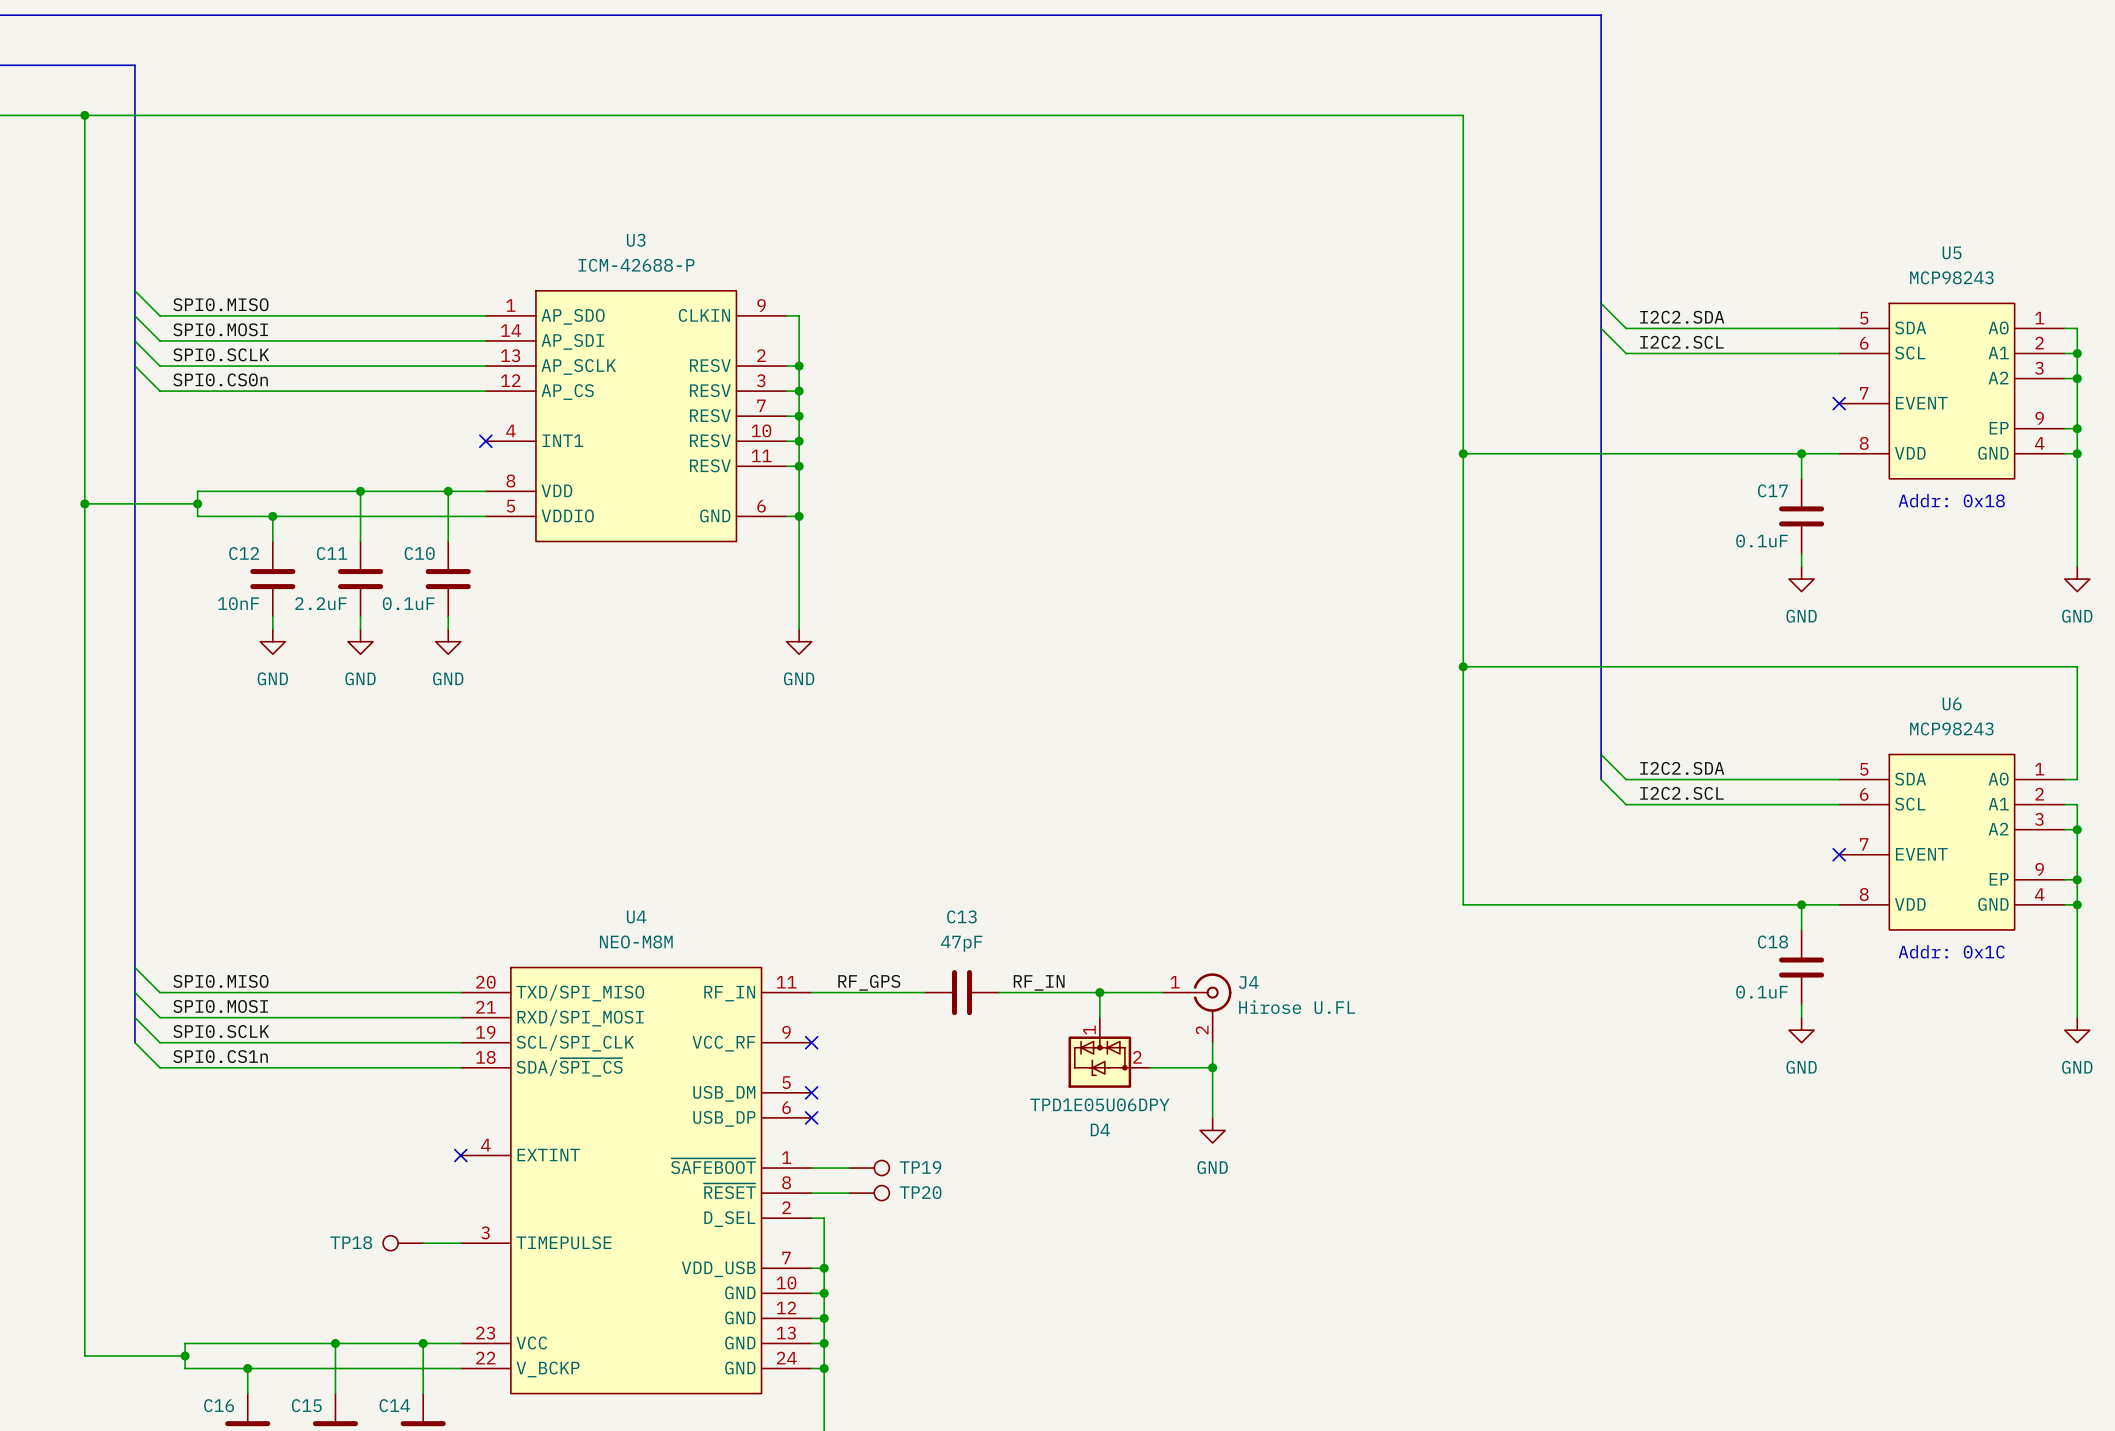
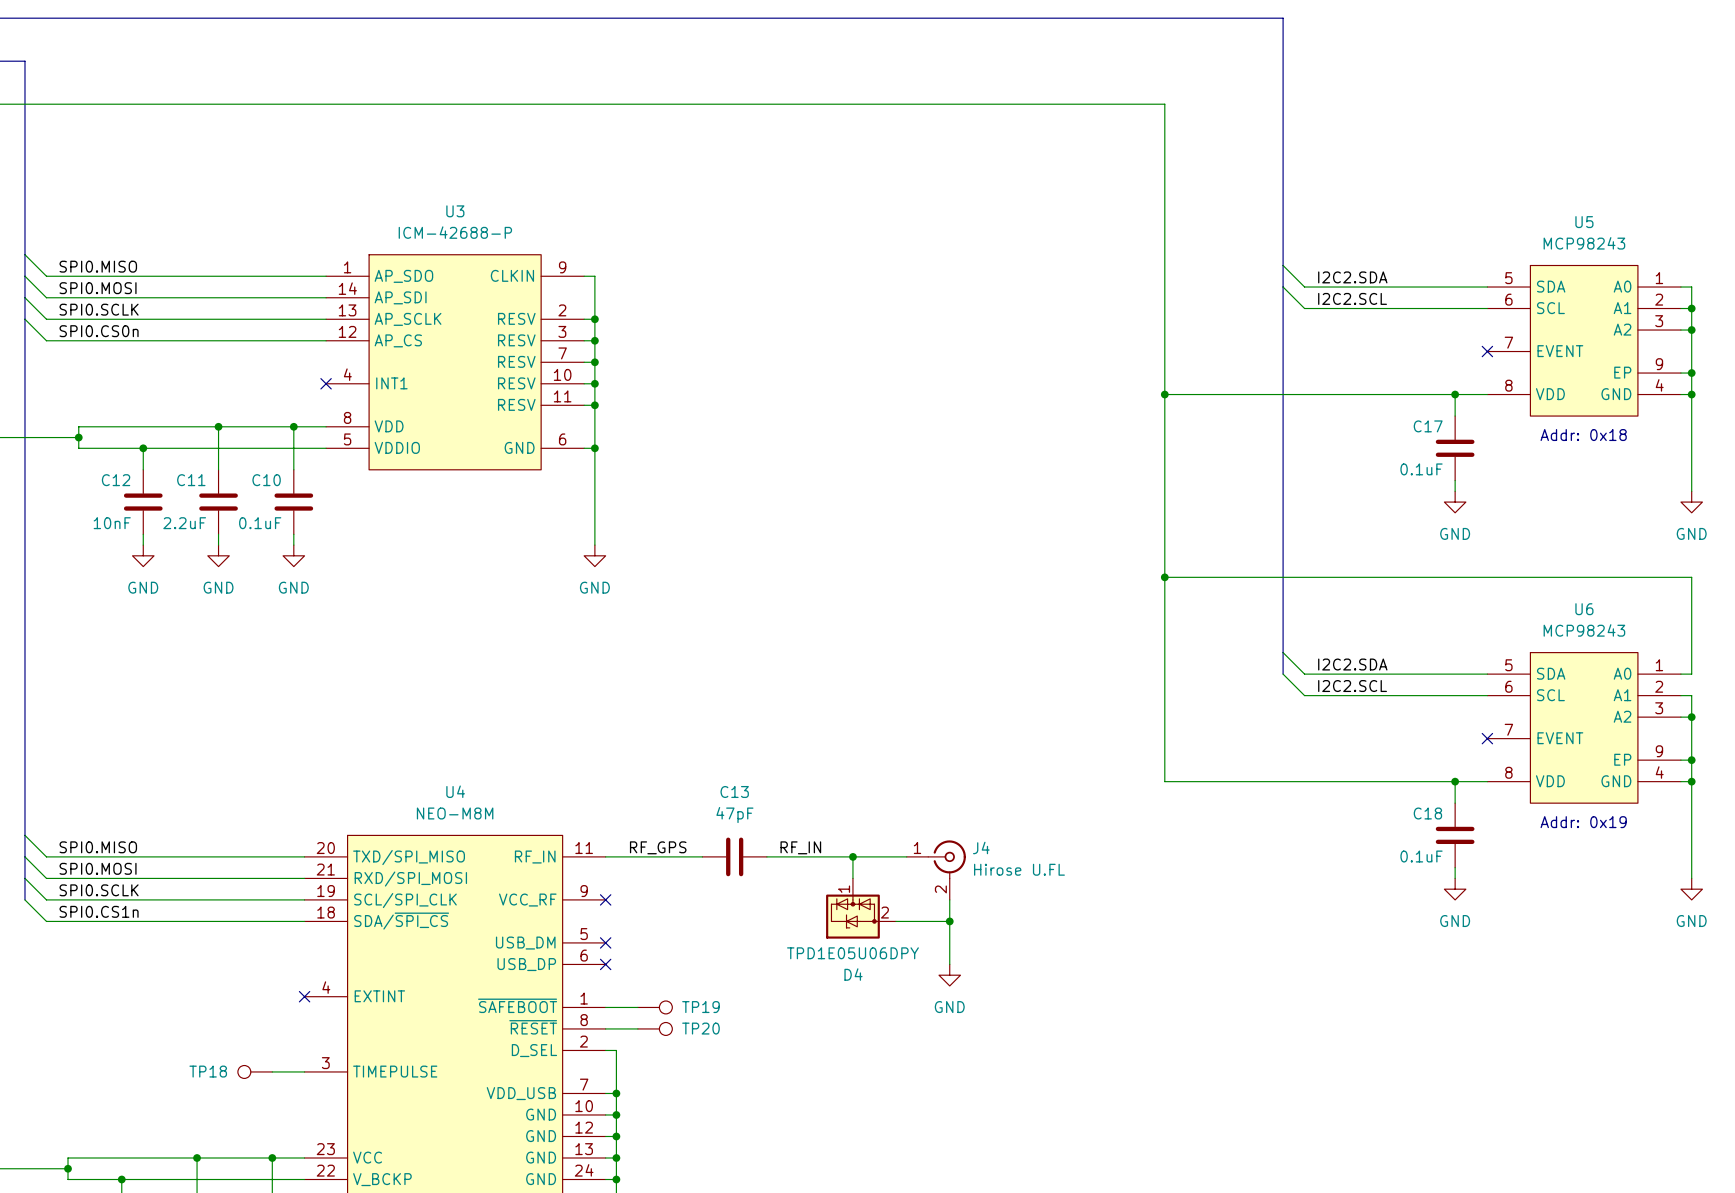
text: Addr: 0x1C (1951, 951) -> Addr: 0x19 (1583, 822)

